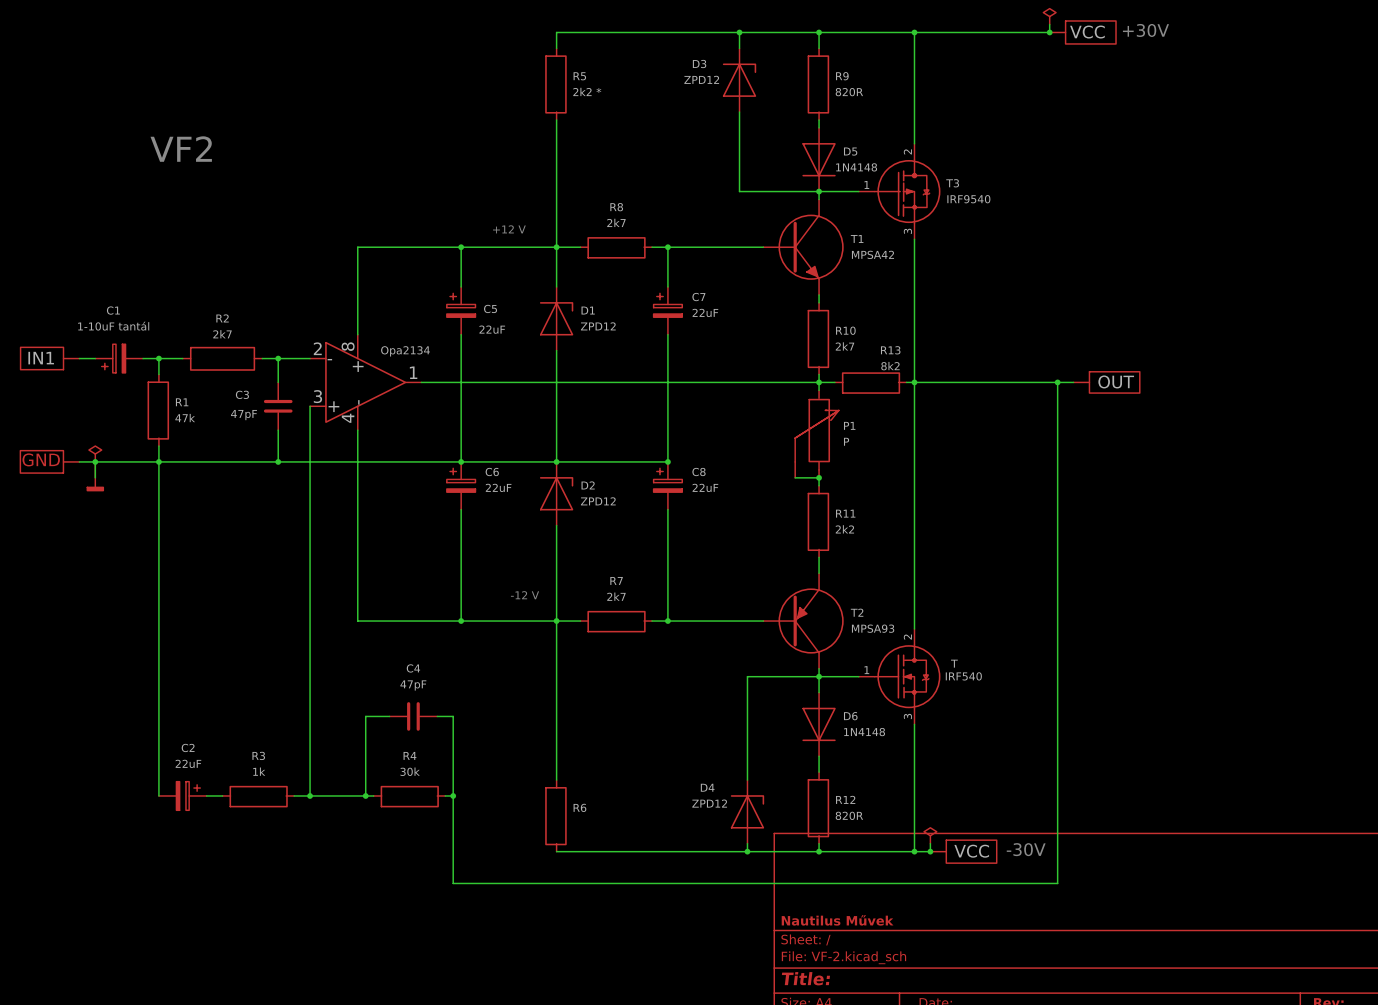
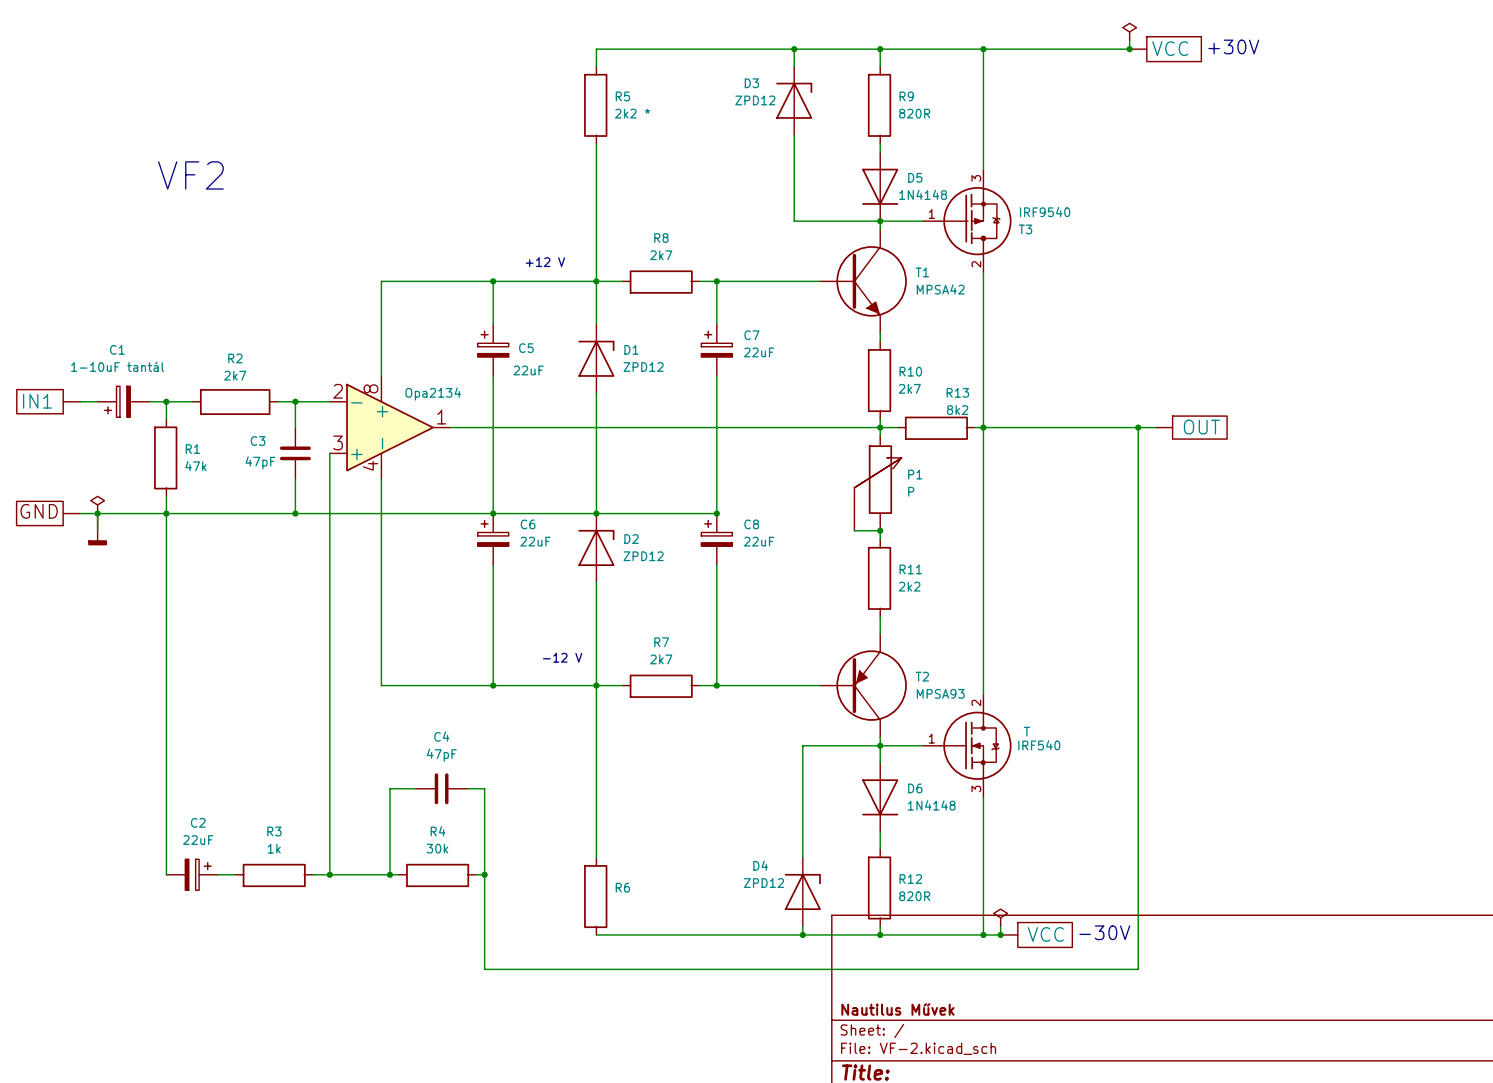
T3 flip: as is (907, 191) -> up-down (975, 221)

